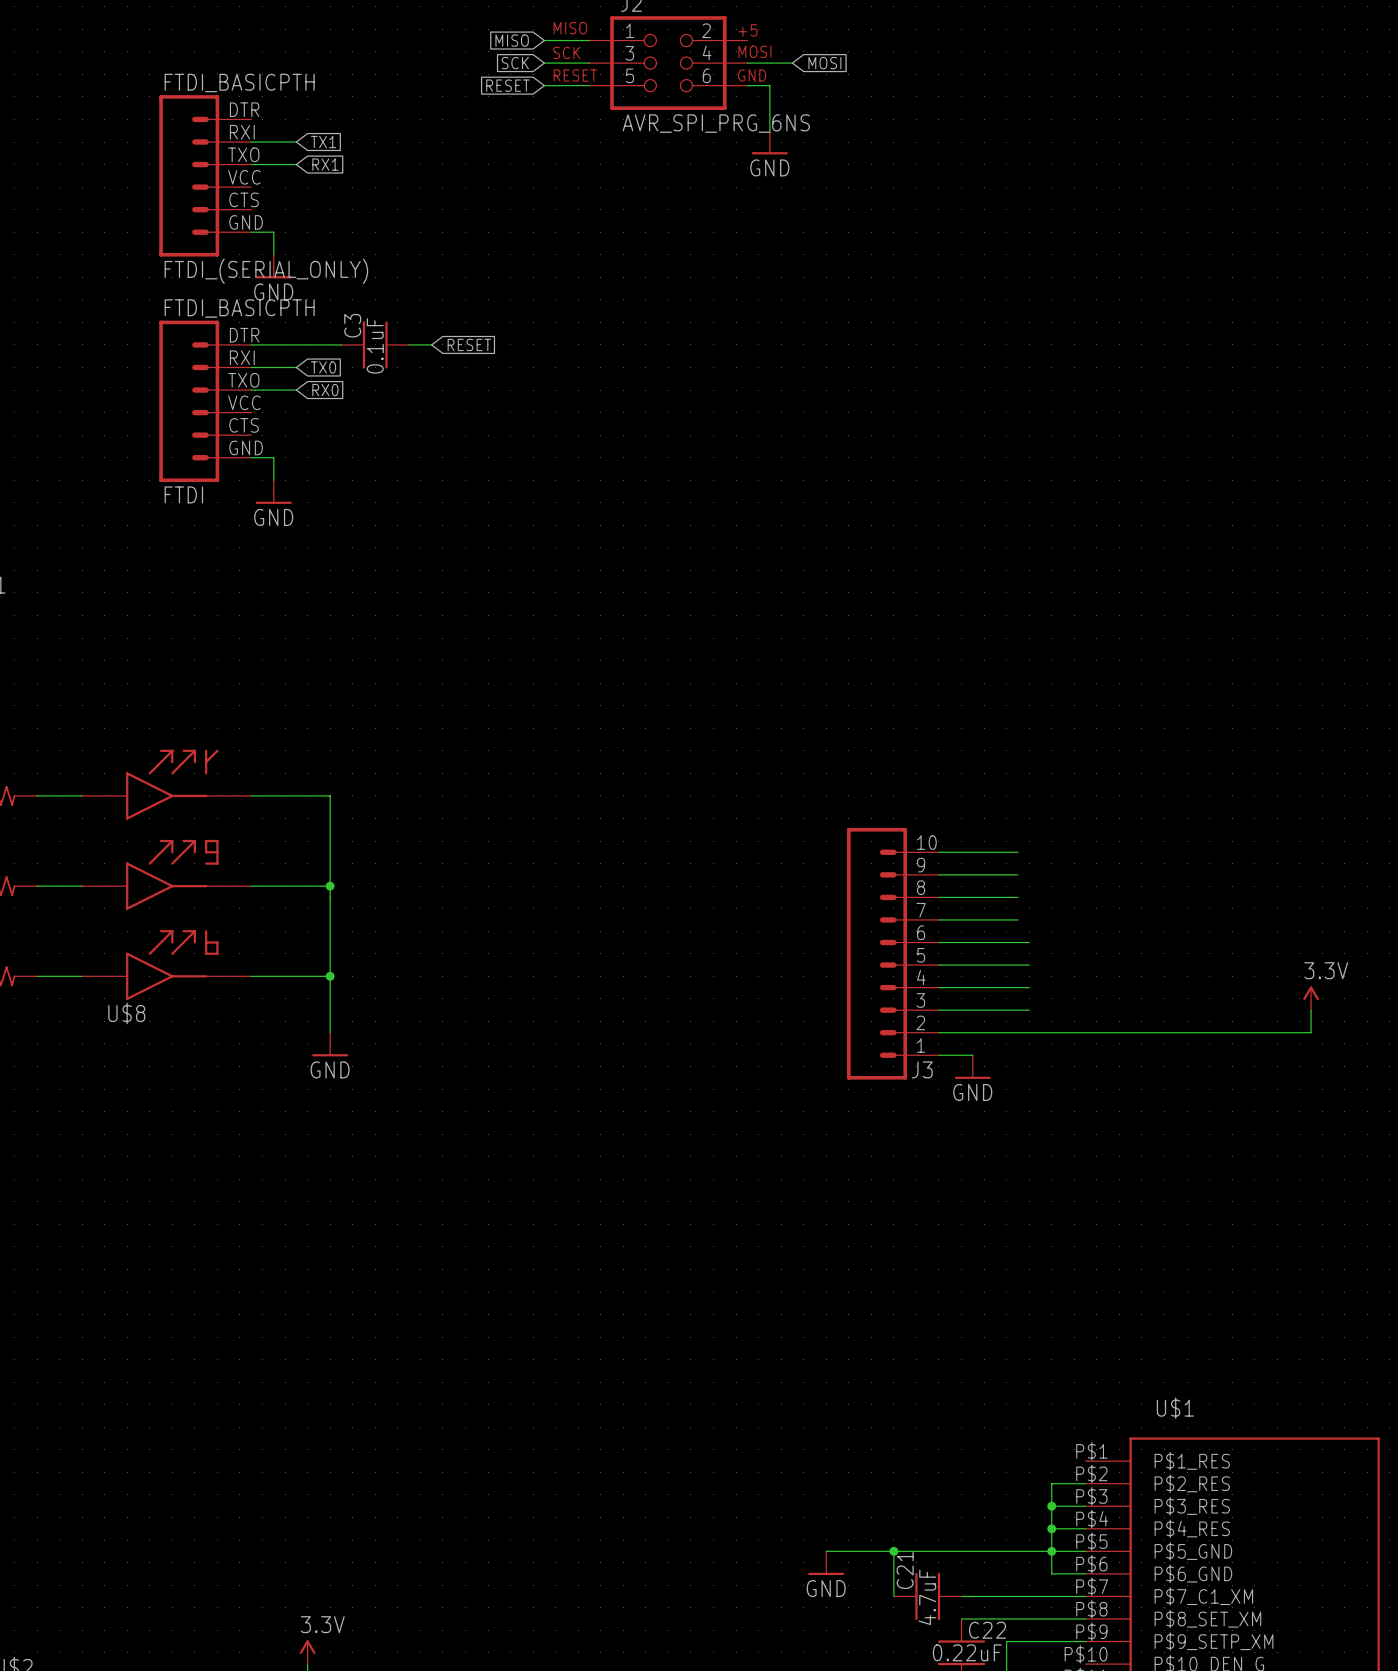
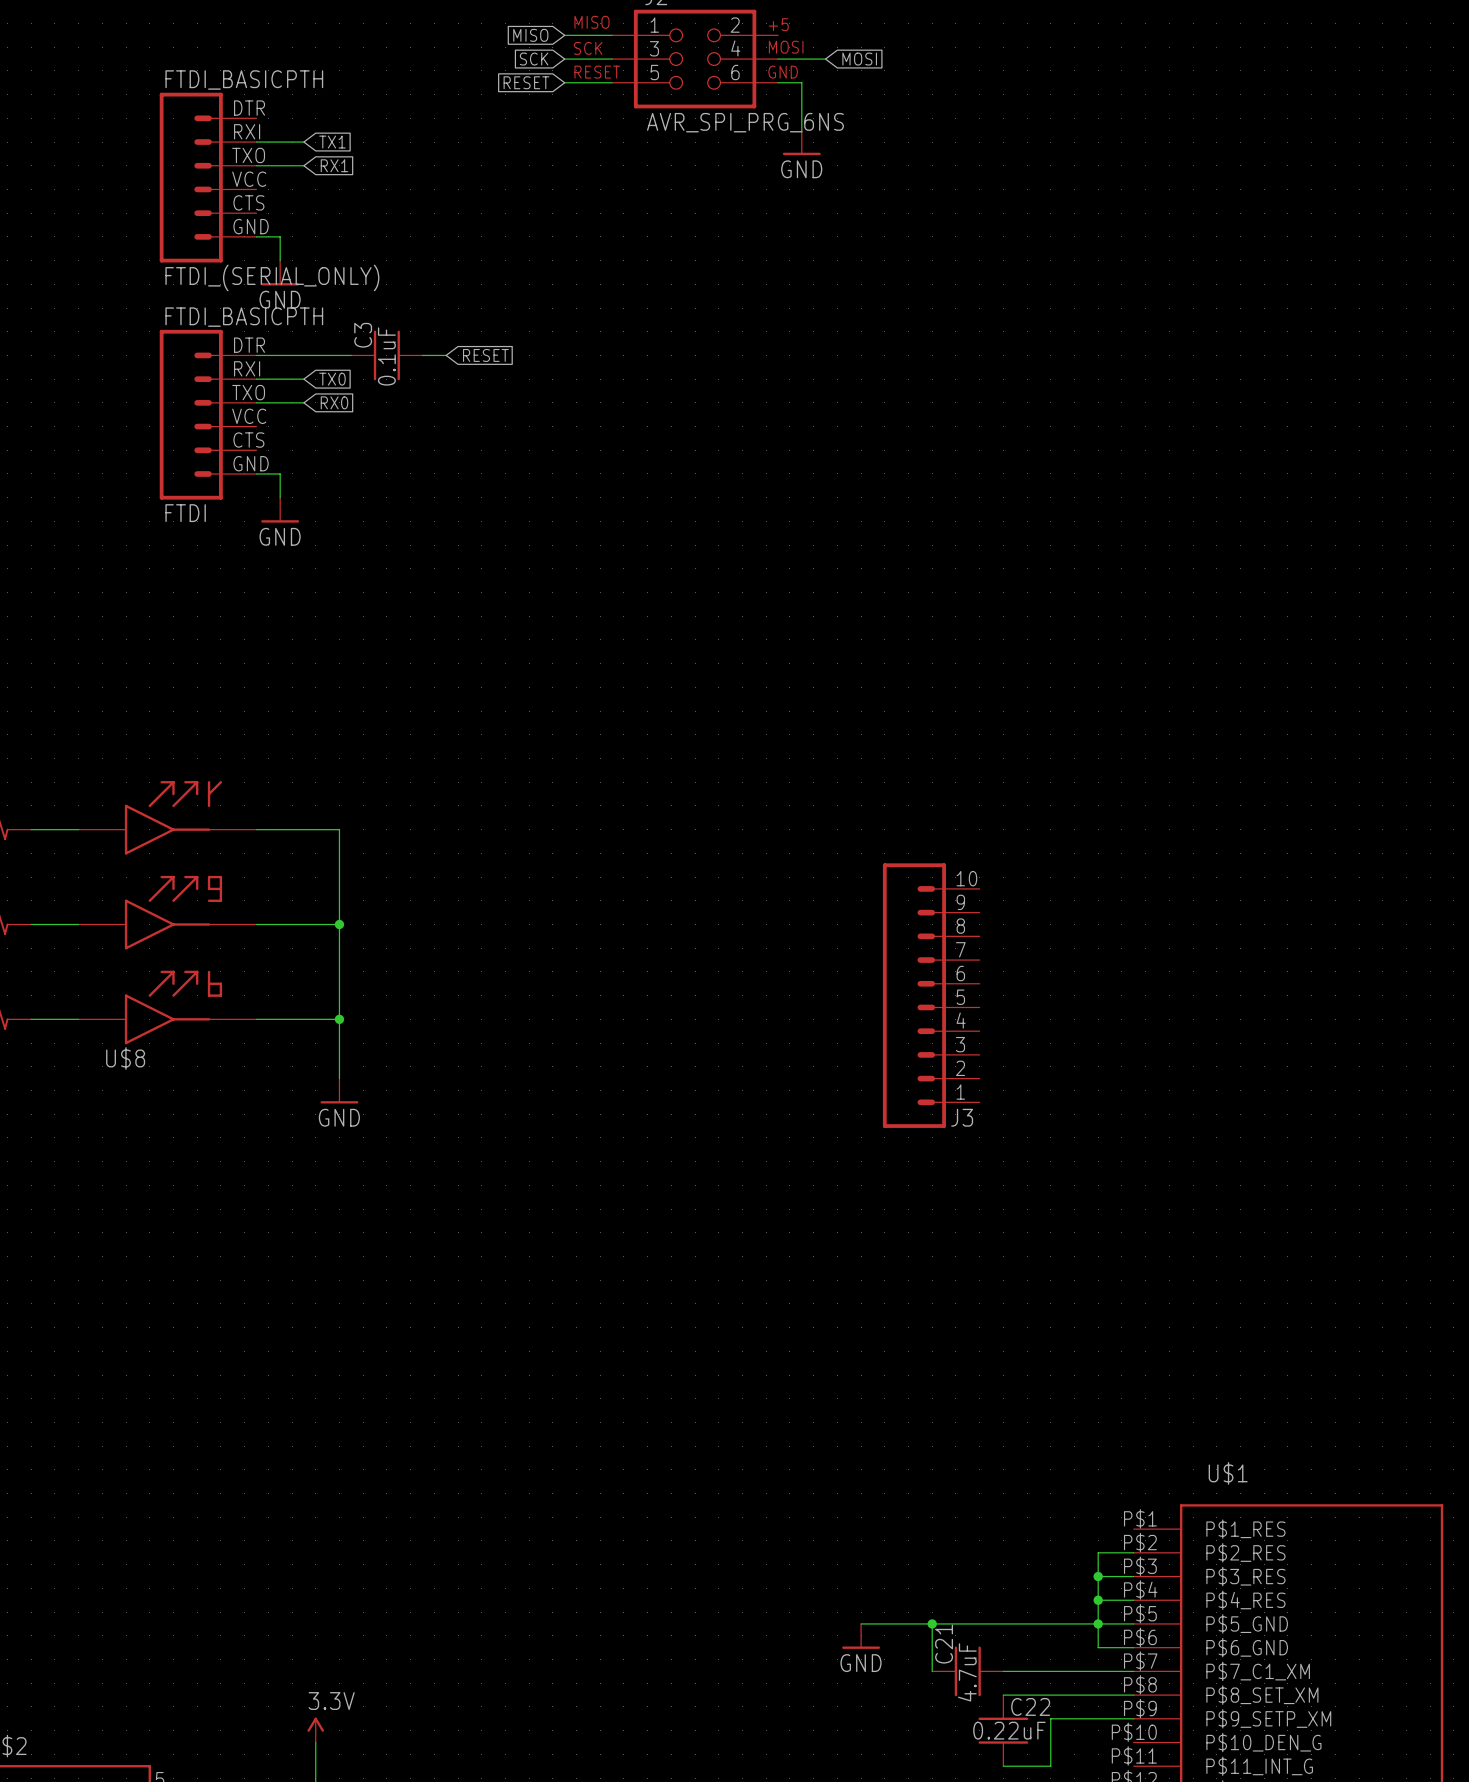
wire: (938, 852) (1017, 852) -> none
wire: (938, 874) (1017, 874) -> none
wire: (938, 897) (1017, 897) -> none
wire: (938, 919) (1017, 919) -> none
wire: (938, 942) (1029, 942) -> none
wire: (938, 965) (1029, 965) -> none
wire: (938, 987) (1029, 987) -> none
power symbol: 3.3V (1311, 998) -> none
wire: (938, 1010) (1029, 1010) -> none
wire: (1311, 1010) (1311, 1032) (938, 1032) -> none
wire: (938, 1055) (972, 1055) -> none
power symbol: GND (972, 1067) -> none

